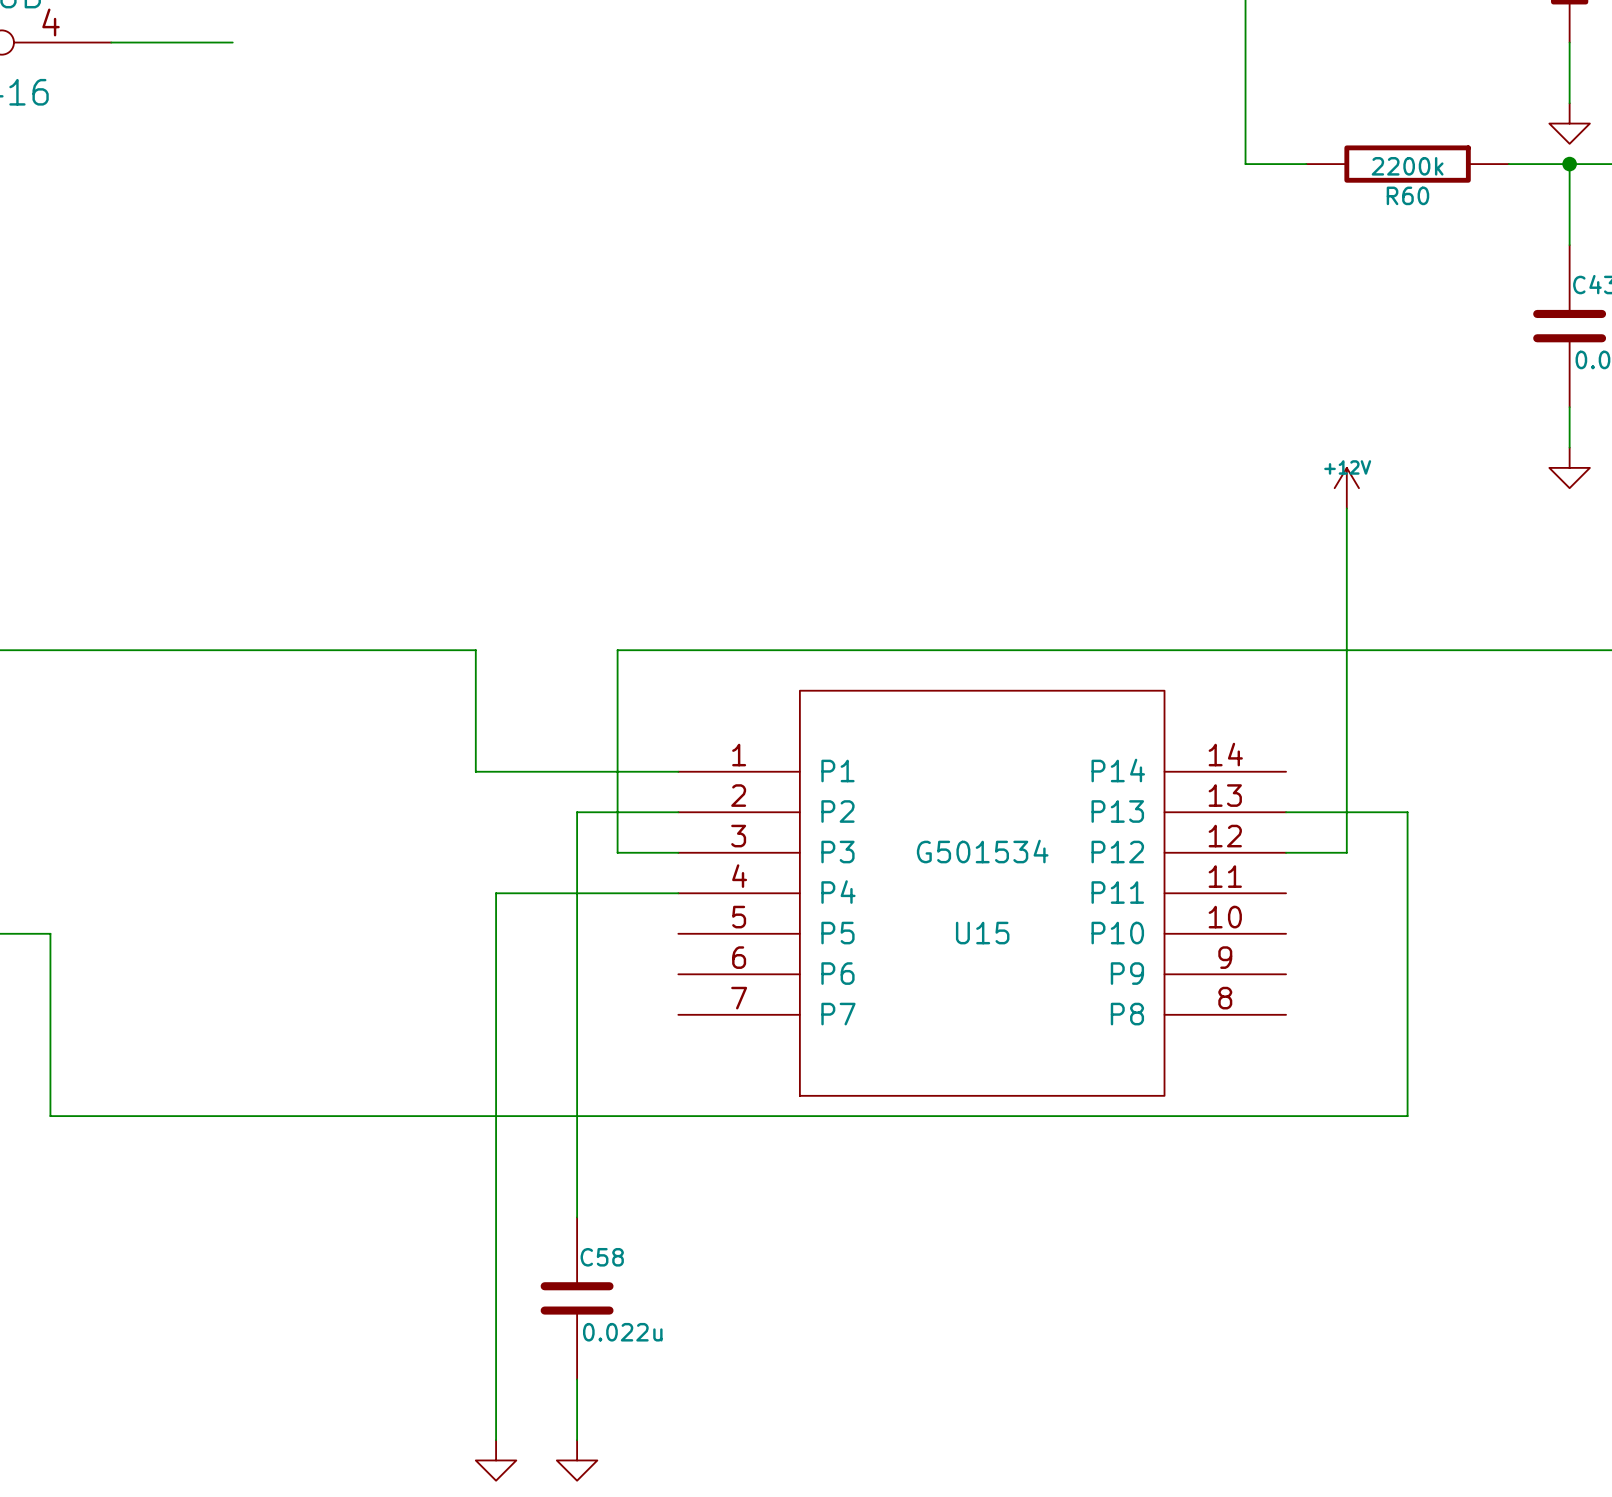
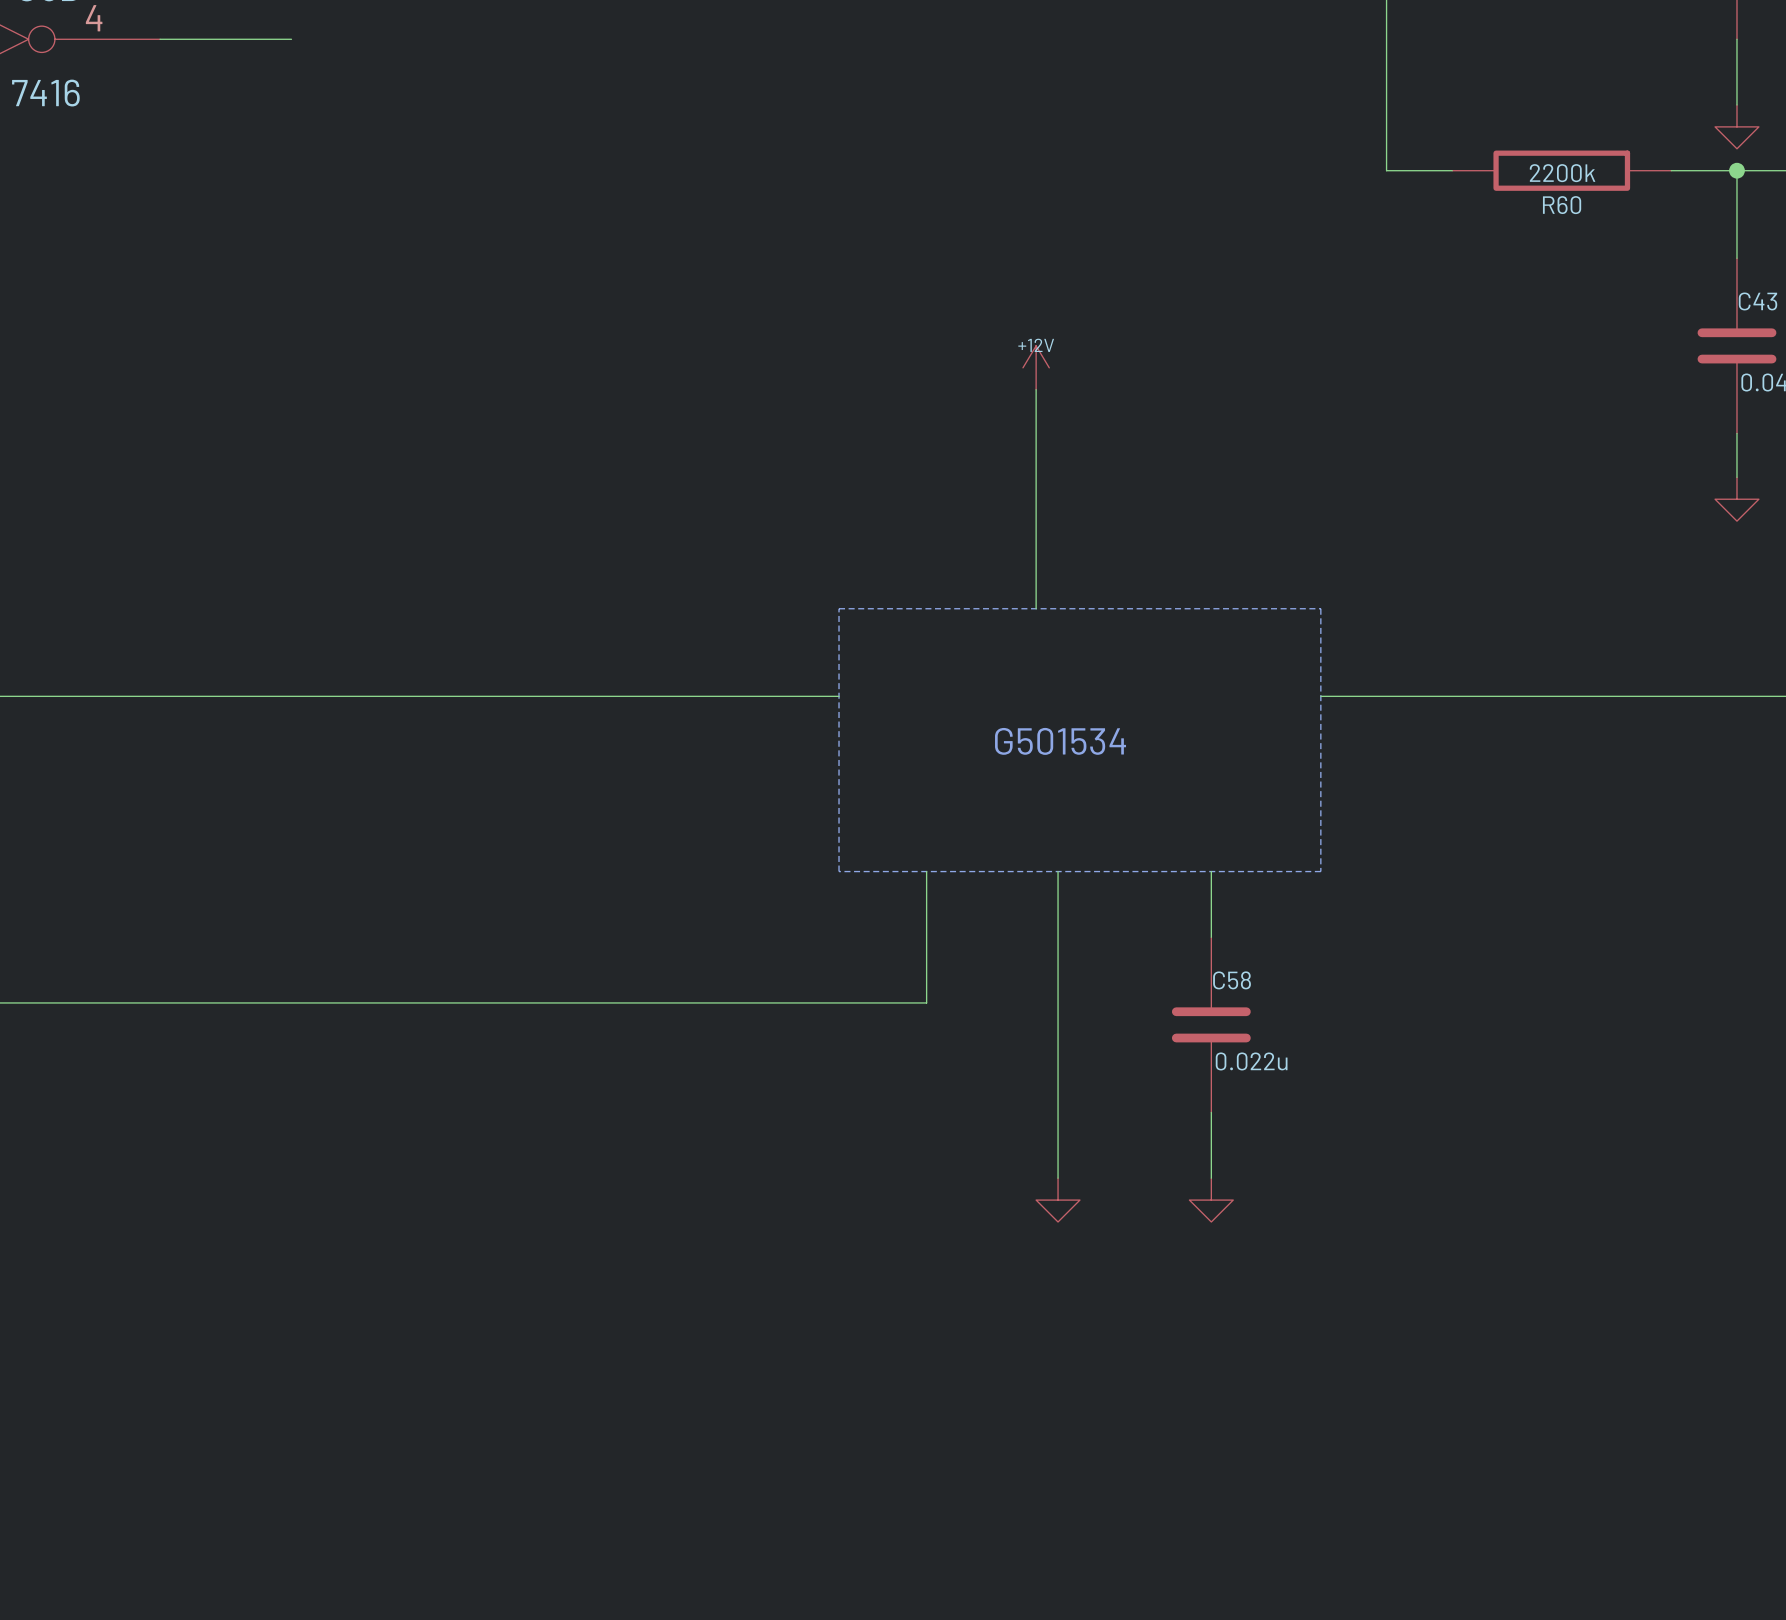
power symbol: none -> +12V (1036, 367)
wire: none -> (1036, 389) (1036, 608)
power symbol: +12V (1346, 488) -> none
wire: (1346, 508) (1346, 852) (1286, 852) -> none
line: none -> (839, 608) (1320, 608) (1320, 871) (839, 871) (839, 608)
wire: (475, 650) (475, 771) (678, 771) -> (554, 696) (707, 696)
wire: (617, 650) (617, 852) (678, 852) -> none
wire: (739, 650) (1184, 650) -> none
text: none -> G501534 (1060, 741)
wire: (678, 812) (577, 812) (577, 1217) -> none
wire: none -> (1058, 871) (1058, 1178)
wire: none -> (1211, 871) (1211, 937)
wire: (1286, 812) (1407, 812) (1407, 1116) (50, 1116) (50, 933) -> (926, 871) (926, 1002) (94, 1002)
wire: (678, 893) (496, 893) (496, 1440) -> none
U15: G501534 (982, 893) -> none
wire: none -> (1211, 1112) (1211, 1178)
power symbol: none -> (1058, 1200)
power symbol: none -> (1211, 1200)
C58 position: (577, 1298) -> (1211, 1024)
wire: (577, 1379) (577, 1440) -> none
power symbol: (496, 1460) -> none
power symbol: (577, 1460) -> none

